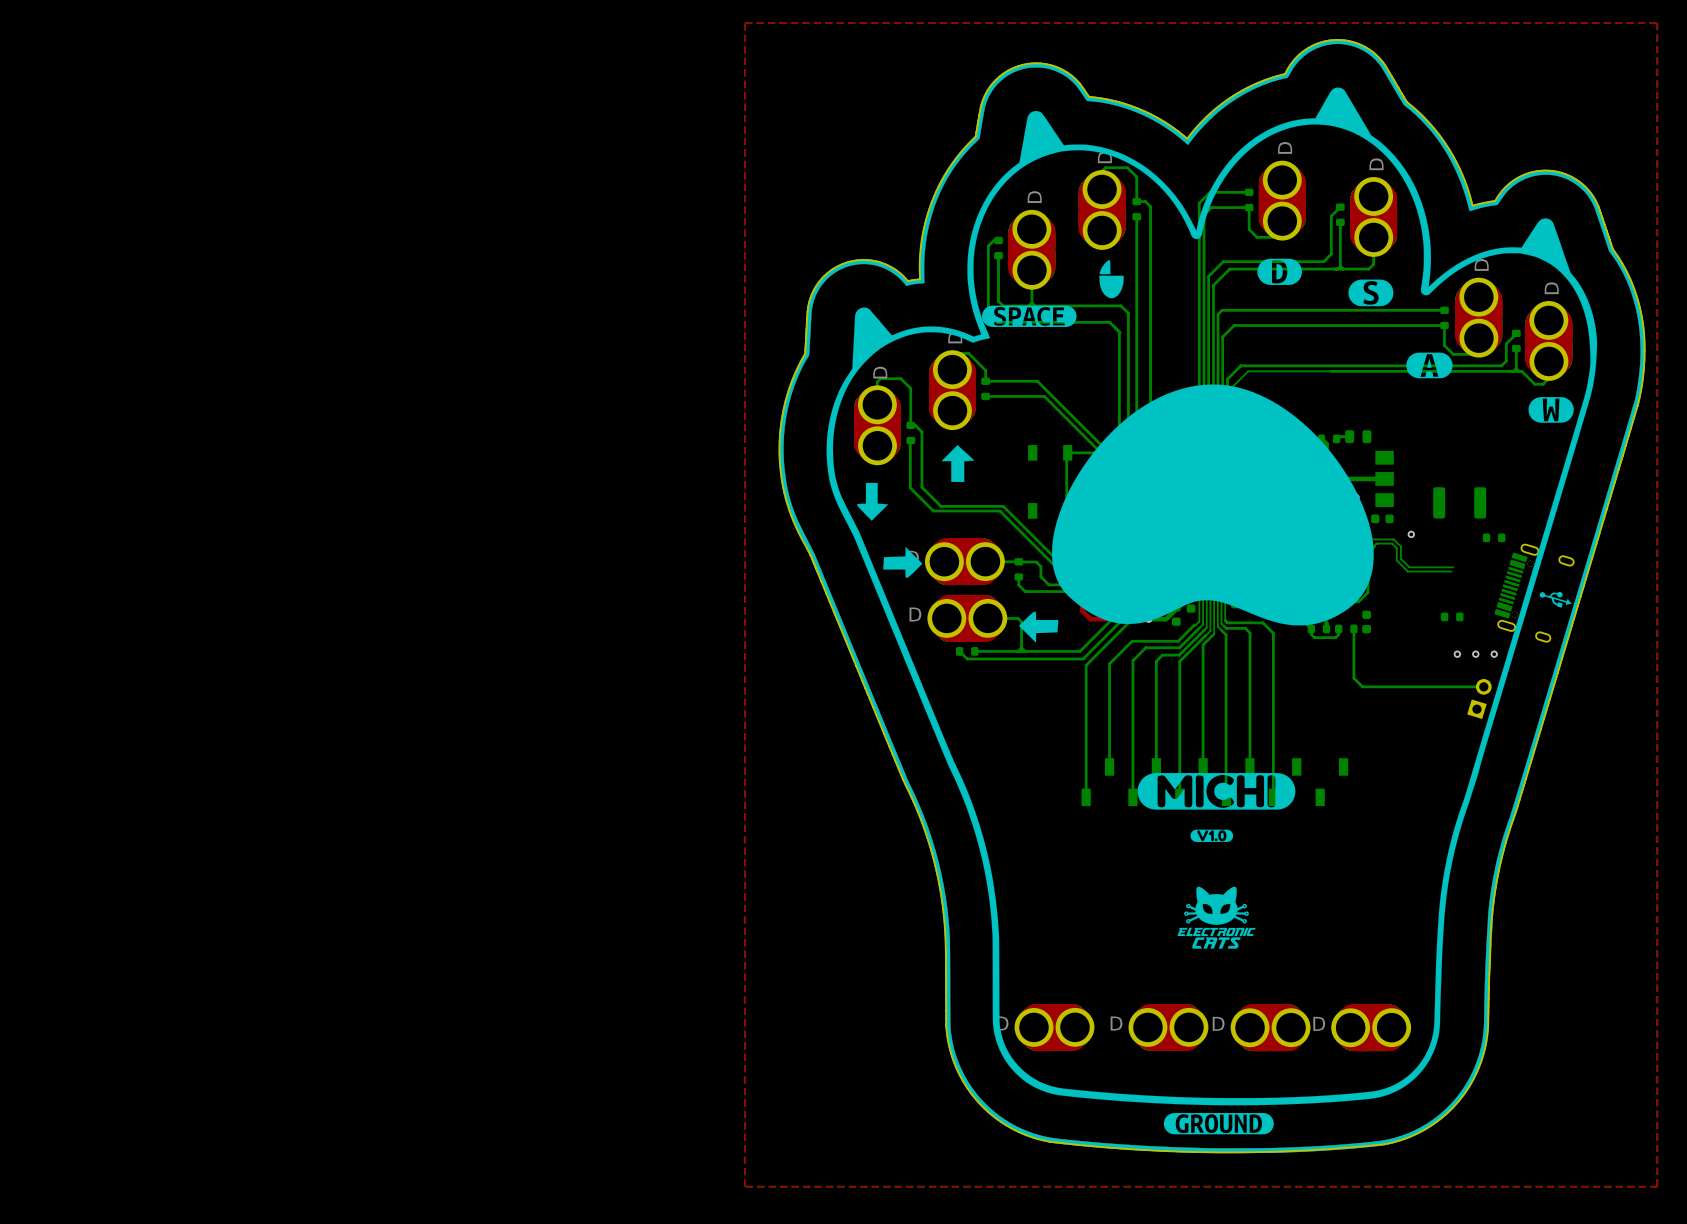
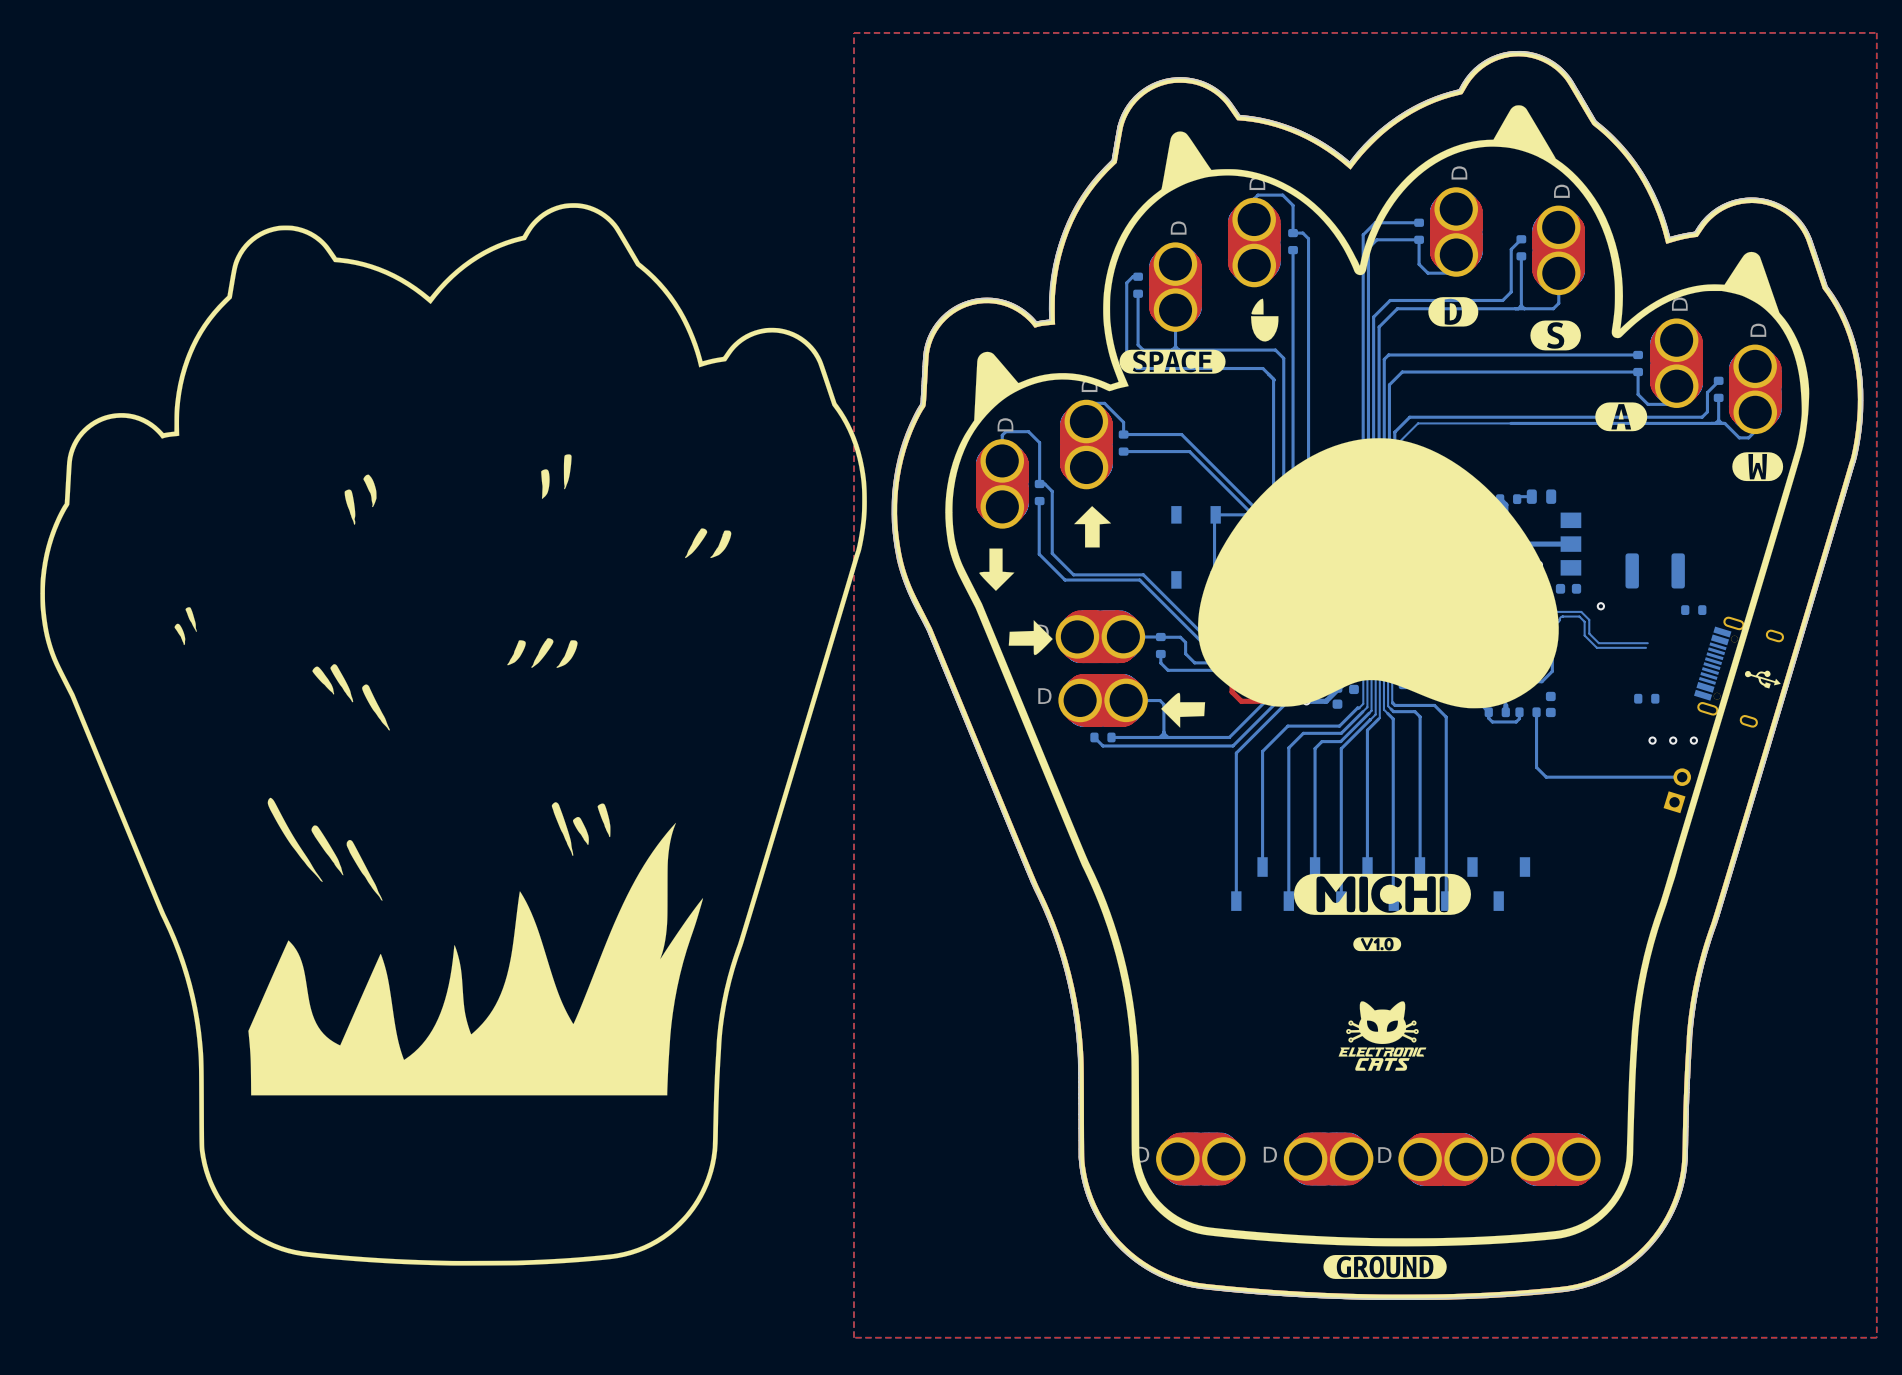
drawing: none -> [40, 203, 867, 1266]

